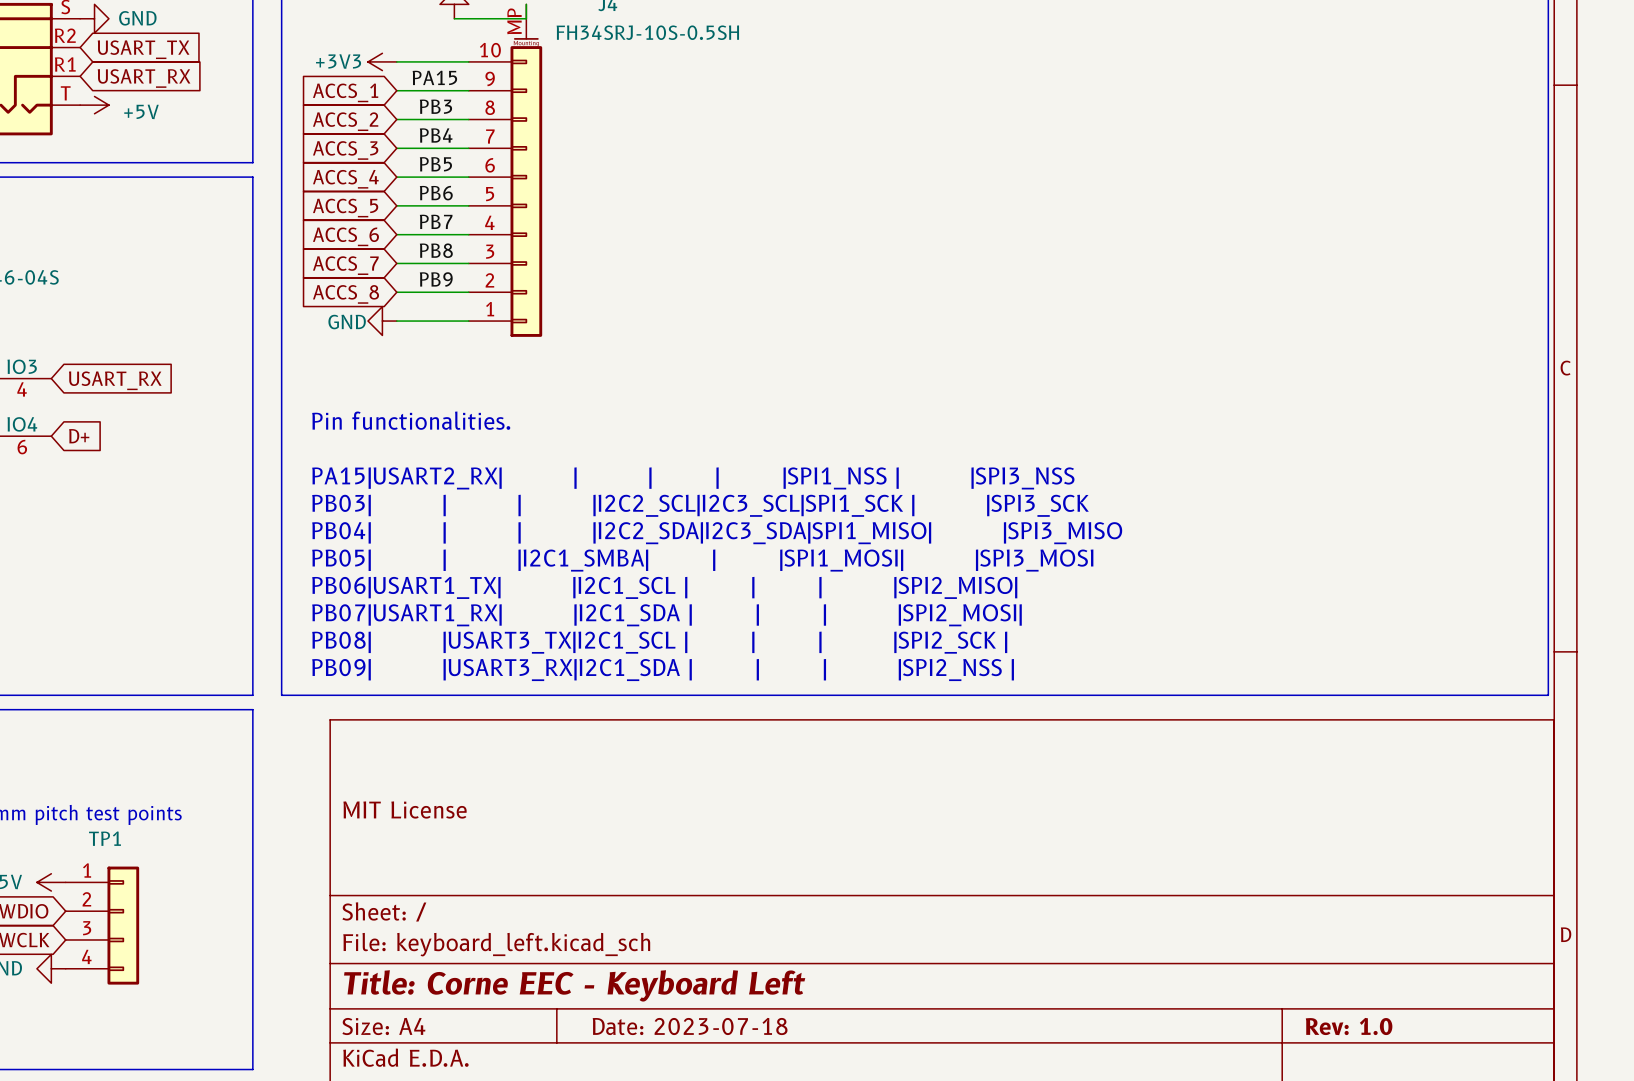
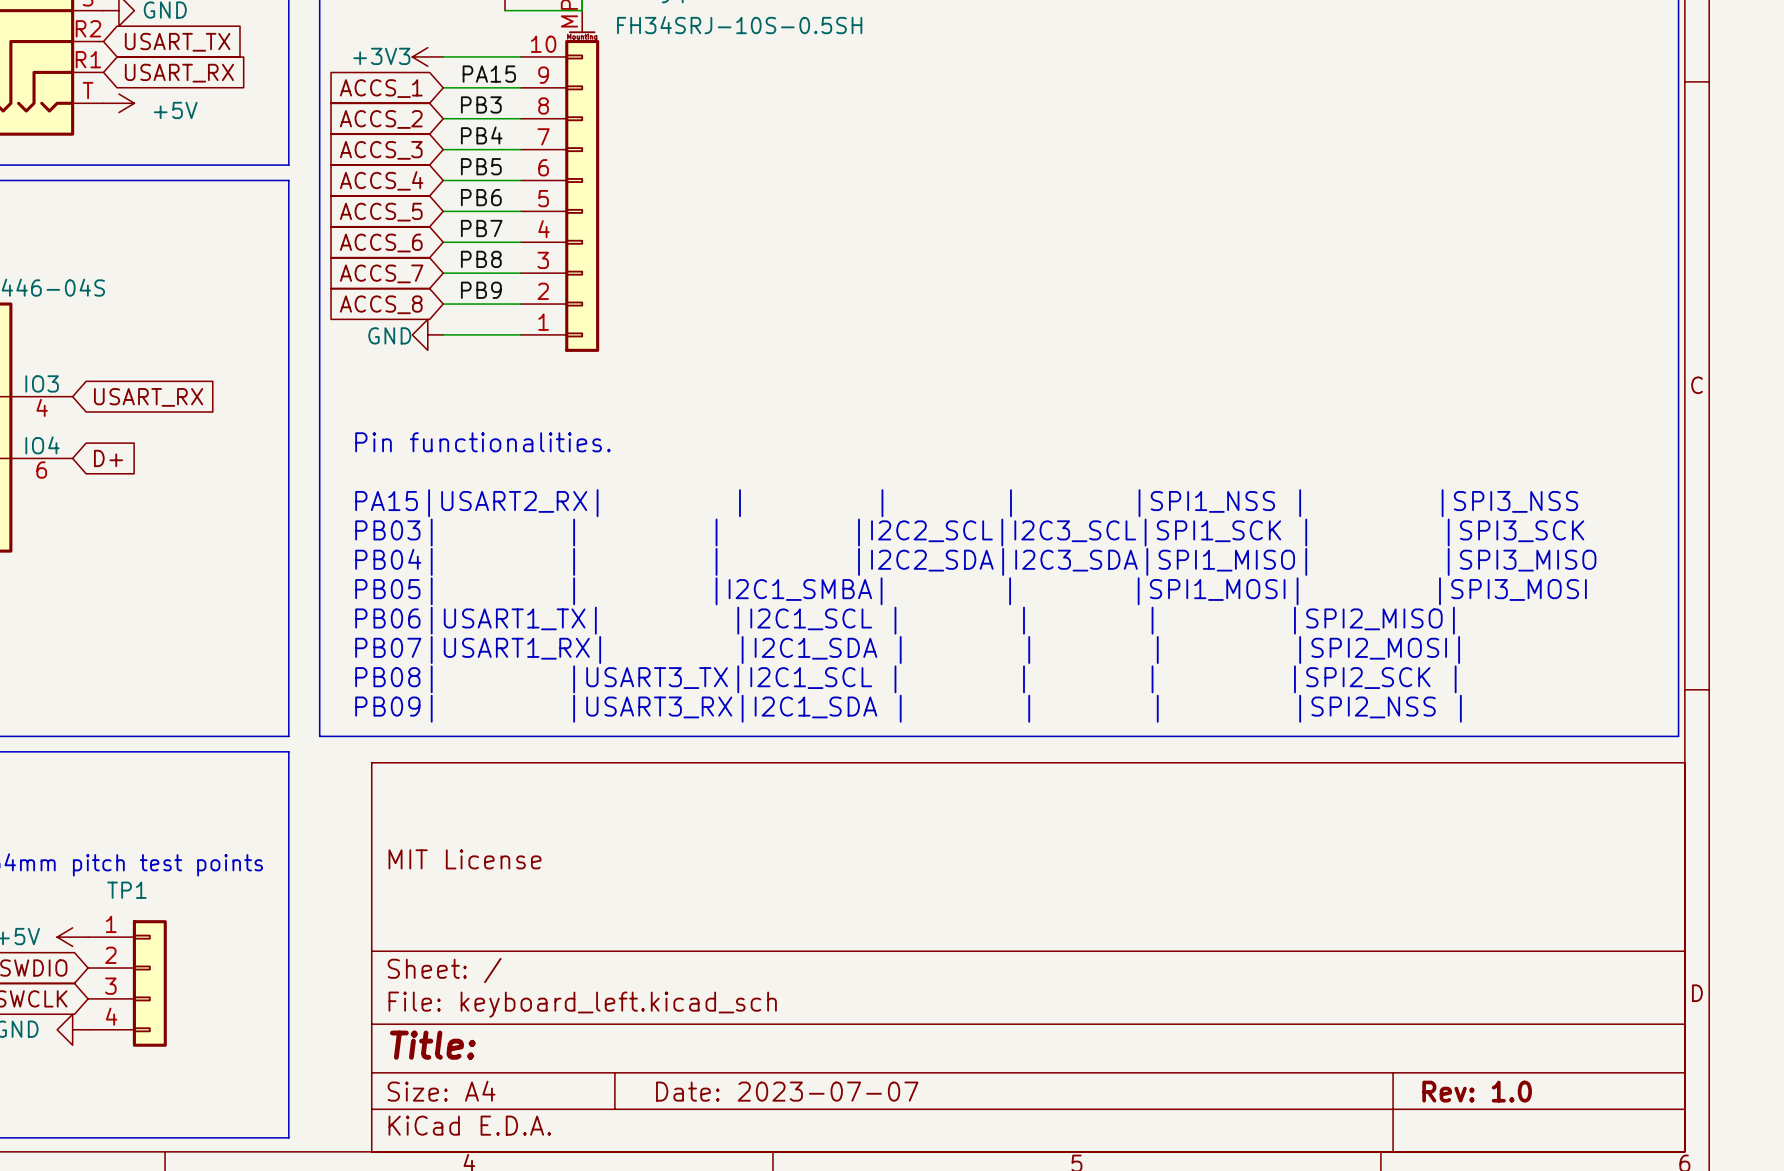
title block: Title: Corne EEC - Keyboard Left (574, 985) -> Title: (432, 1045)
title block: Date: 2023-07-18 (690, 1026) -> Date: 2023-07-07 (787, 1091)

